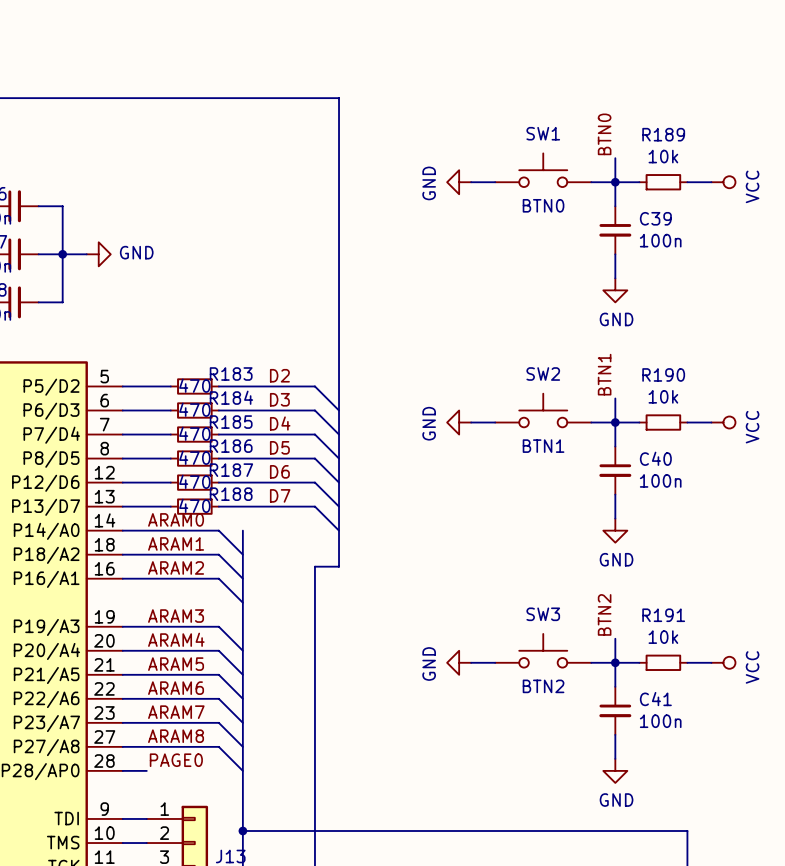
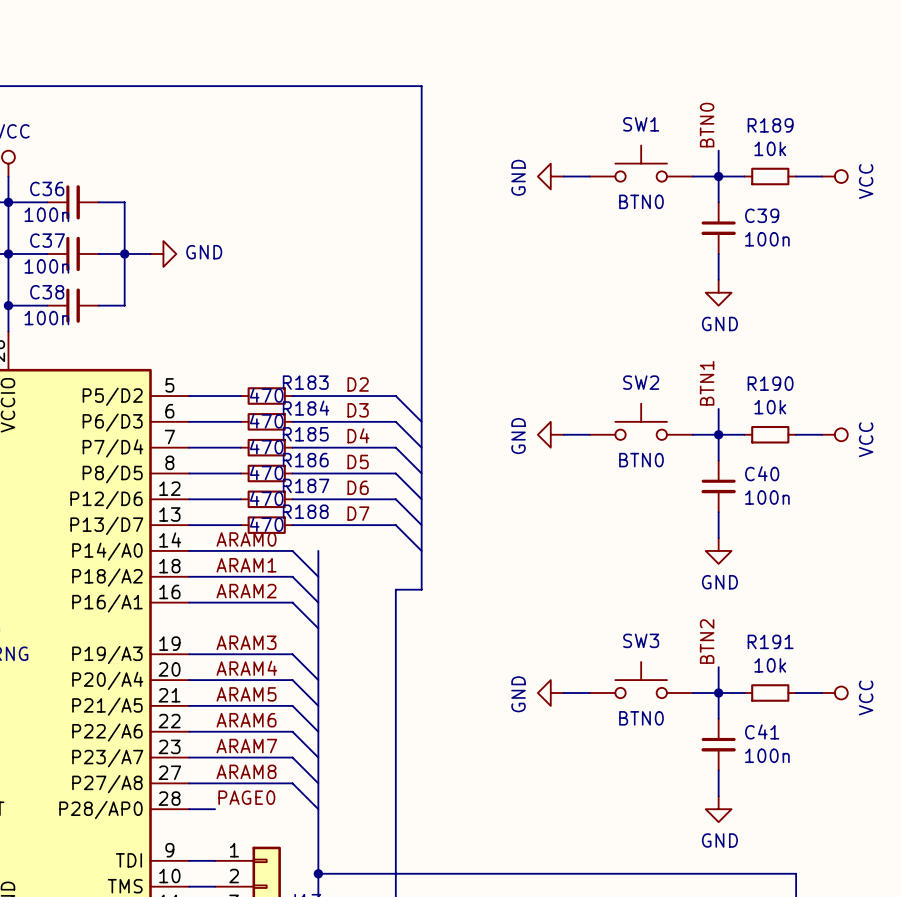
SW2 value: BTN1 (543, 446) -> BTN0 (641, 460)
SW3 value: BTN2 (543, 686) -> BTN0 (641, 718)

